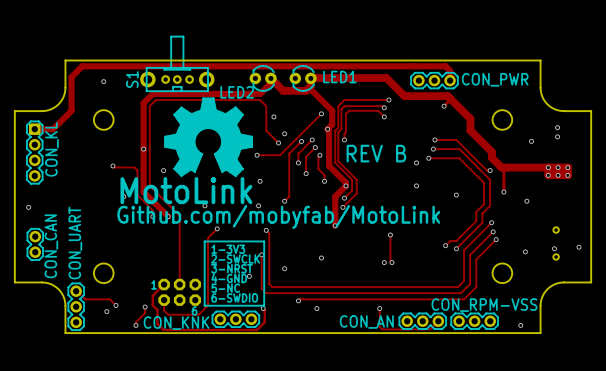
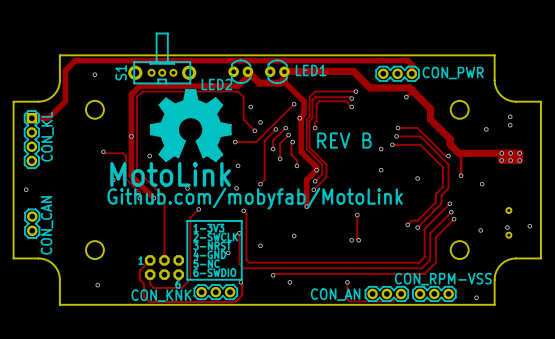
track: (76, 291) (85, 299) (109, 299) (116, 305) -> none
via: (116, 305) -> none
CON_UART: (76, 306) -> none
track: (145, 307) (145, 313) (135, 322) (135, 325) -> none
via: (145, 307) -> none
via: (135, 325) -> none

